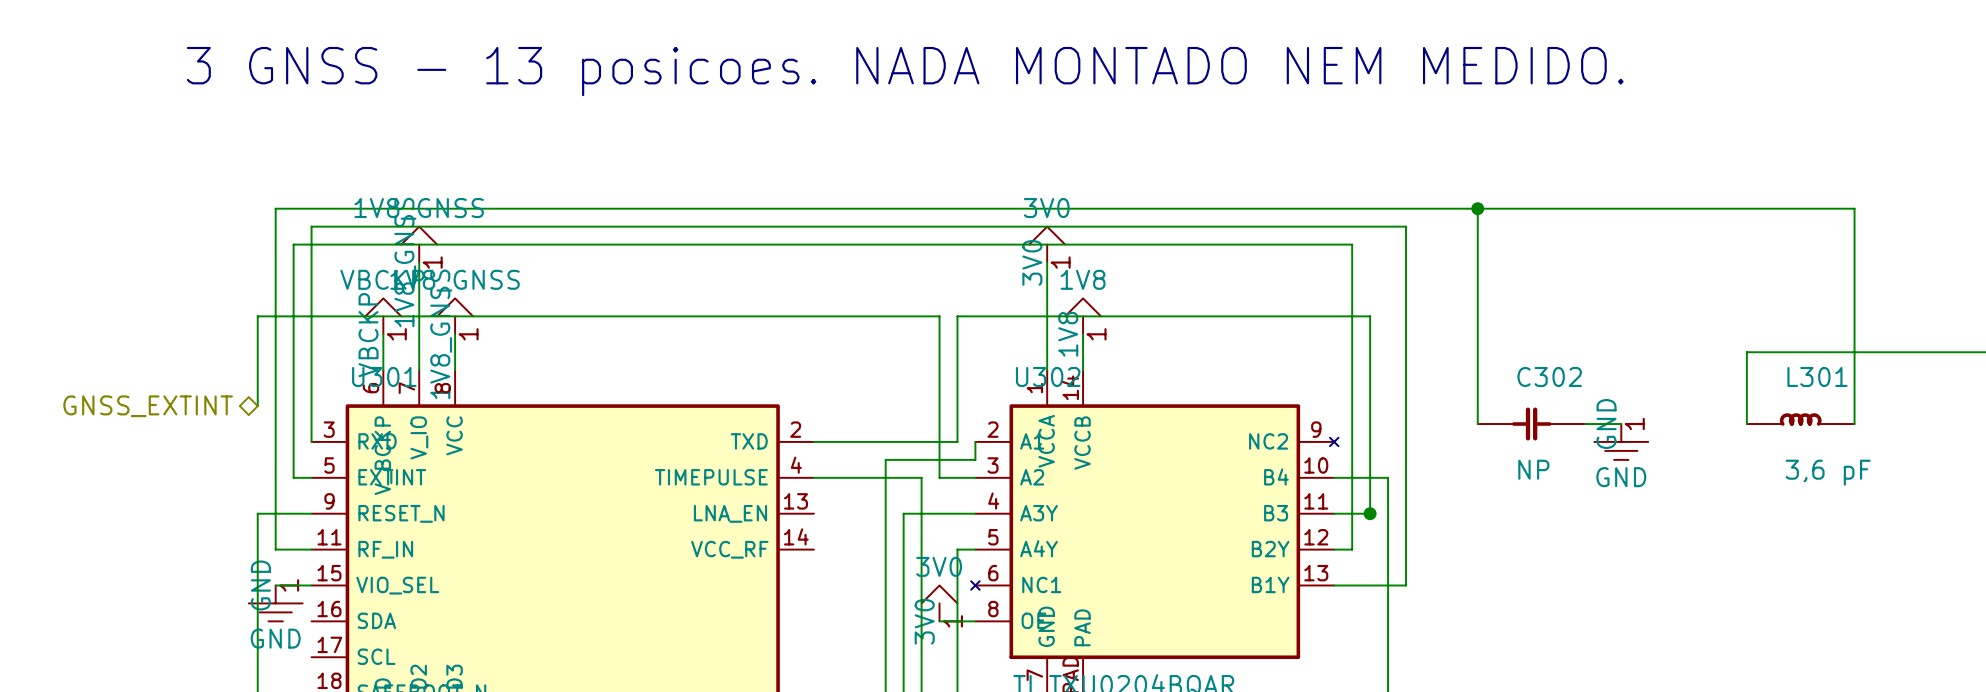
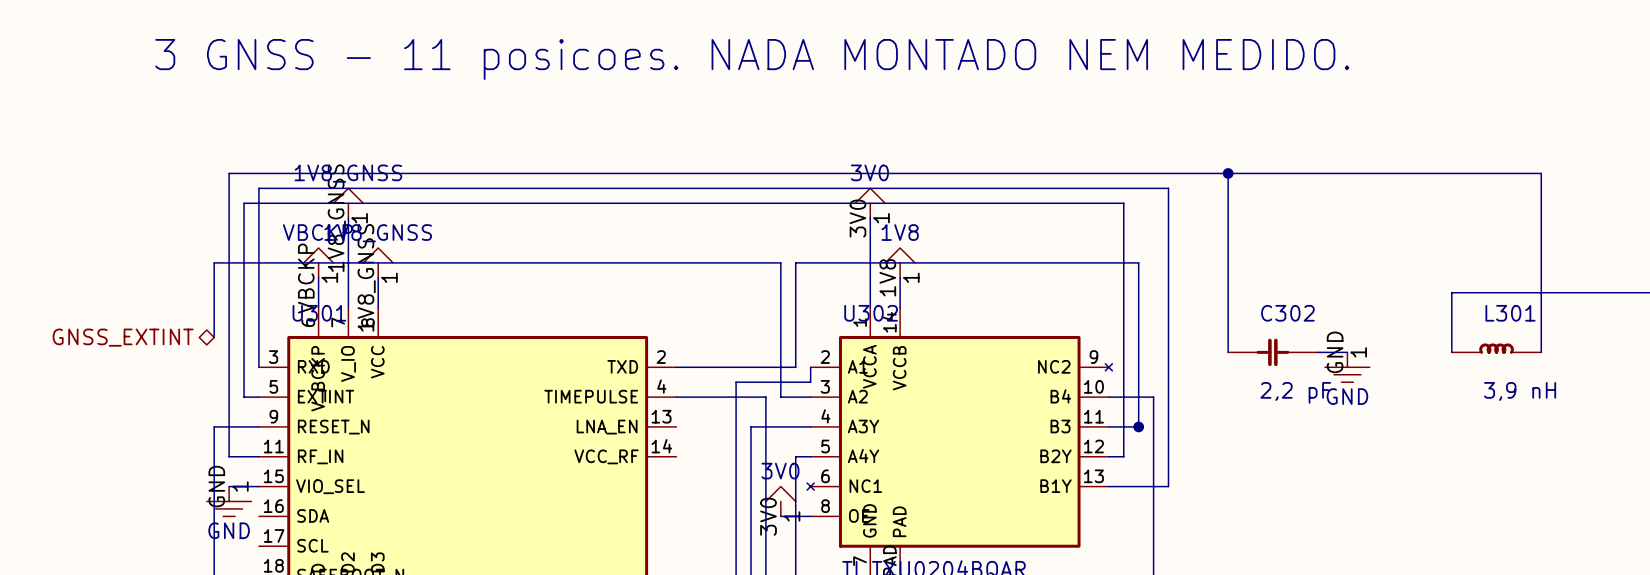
text: 3 GNSS - 13 posicoes. NADA MONTADO NEM MEDIDO. (905, 71) -> 3 GNSS - 11 posicoes. NADA MONTADO NEM MEDIDO. (752, 59)
C302 value: NP (1533, 469) -> 2,2 pF (1295, 392)
L301 value: 3,6 pF (1828, 472) -> 3,9 nH (1520, 391)

